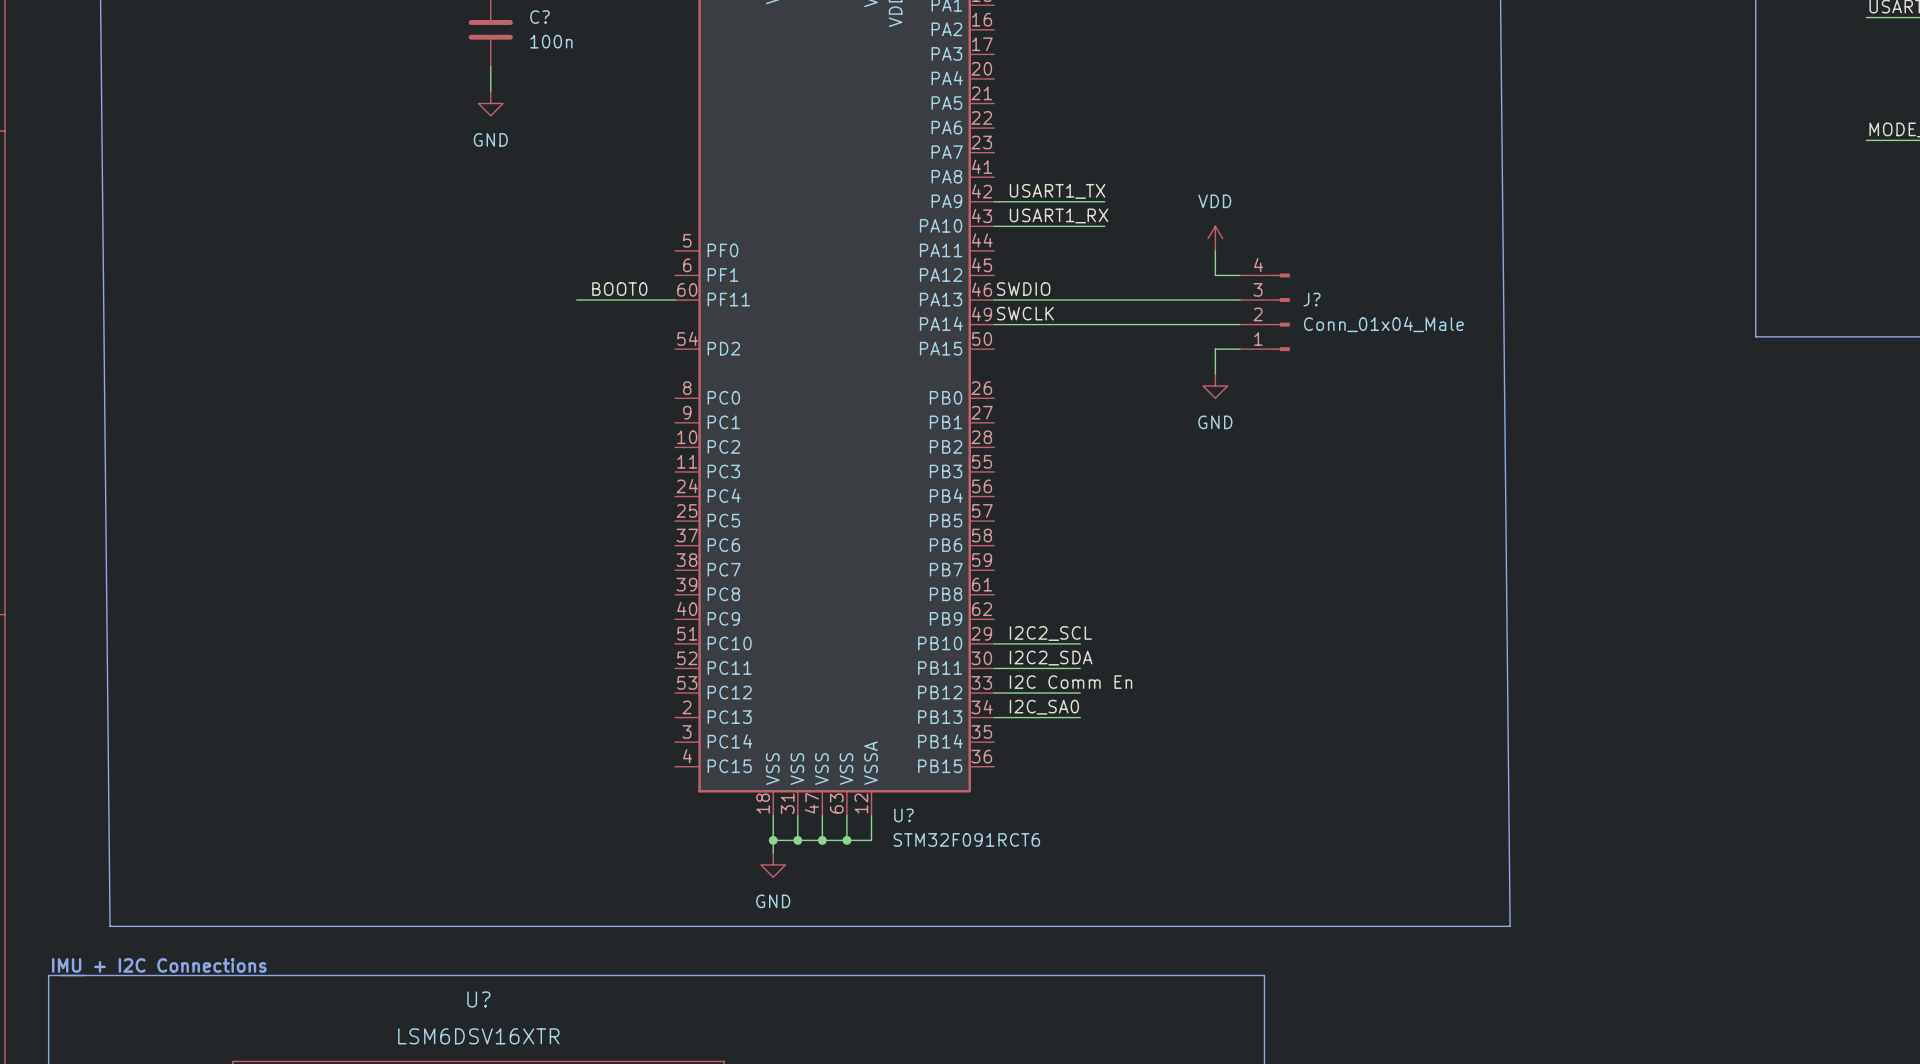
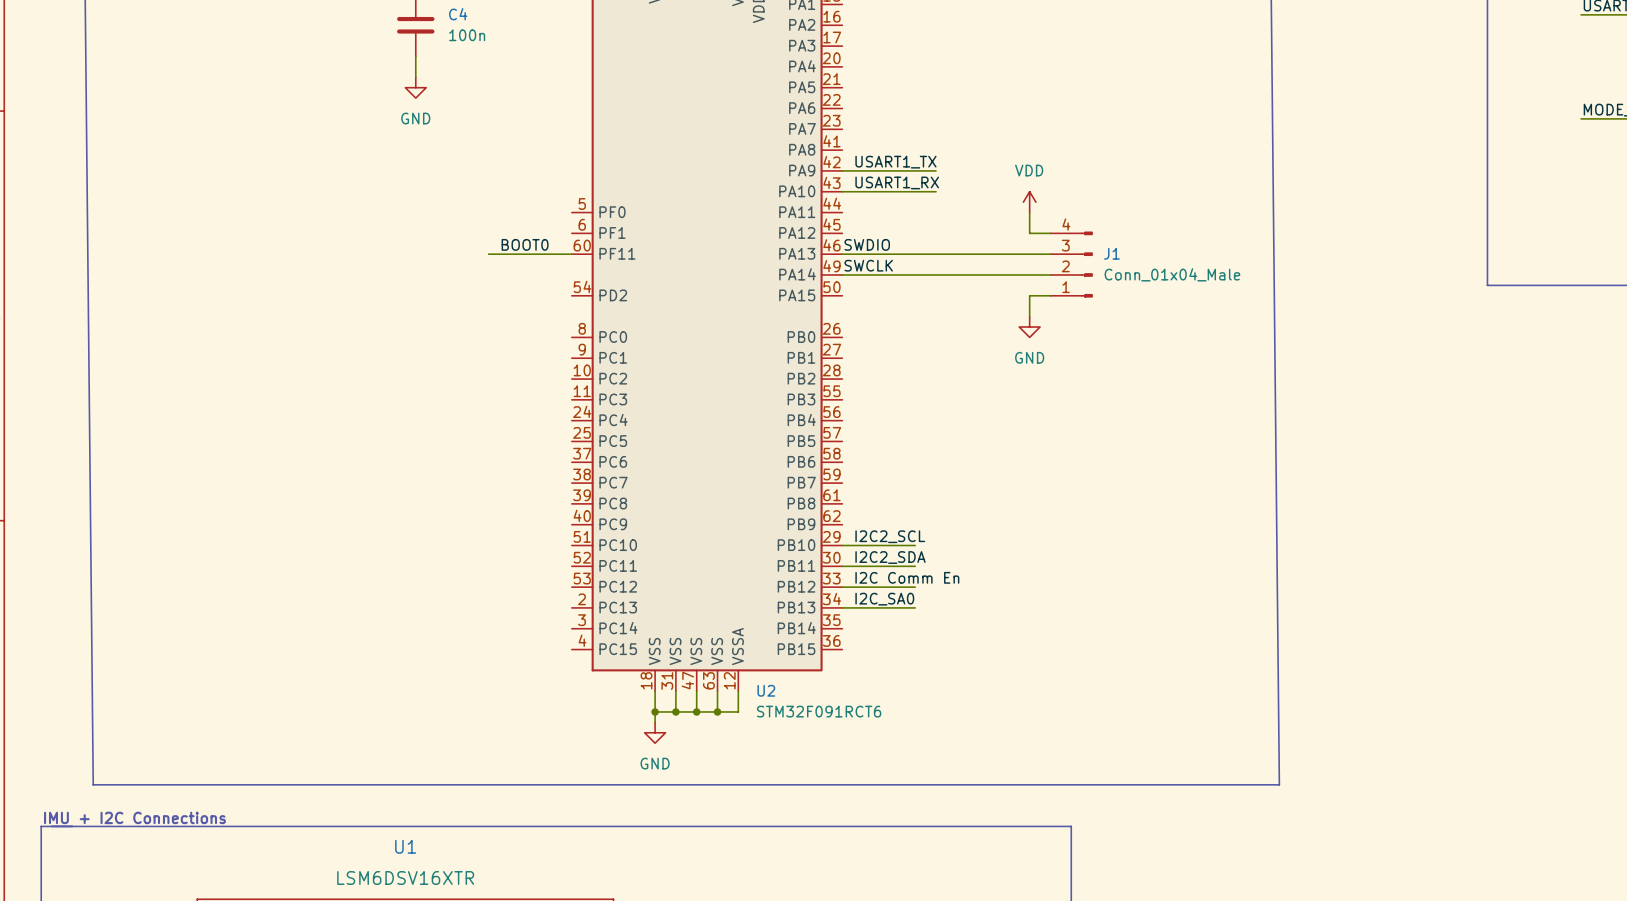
C? name: C? (539, 17) -> C4 (458, 14)
J? name: J? (1311, 299) -> J1 (1111, 253)
U? name: U? (903, 815) -> U2 (766, 690)
U? name: U? (478, 999) -> U1 (405, 846)

